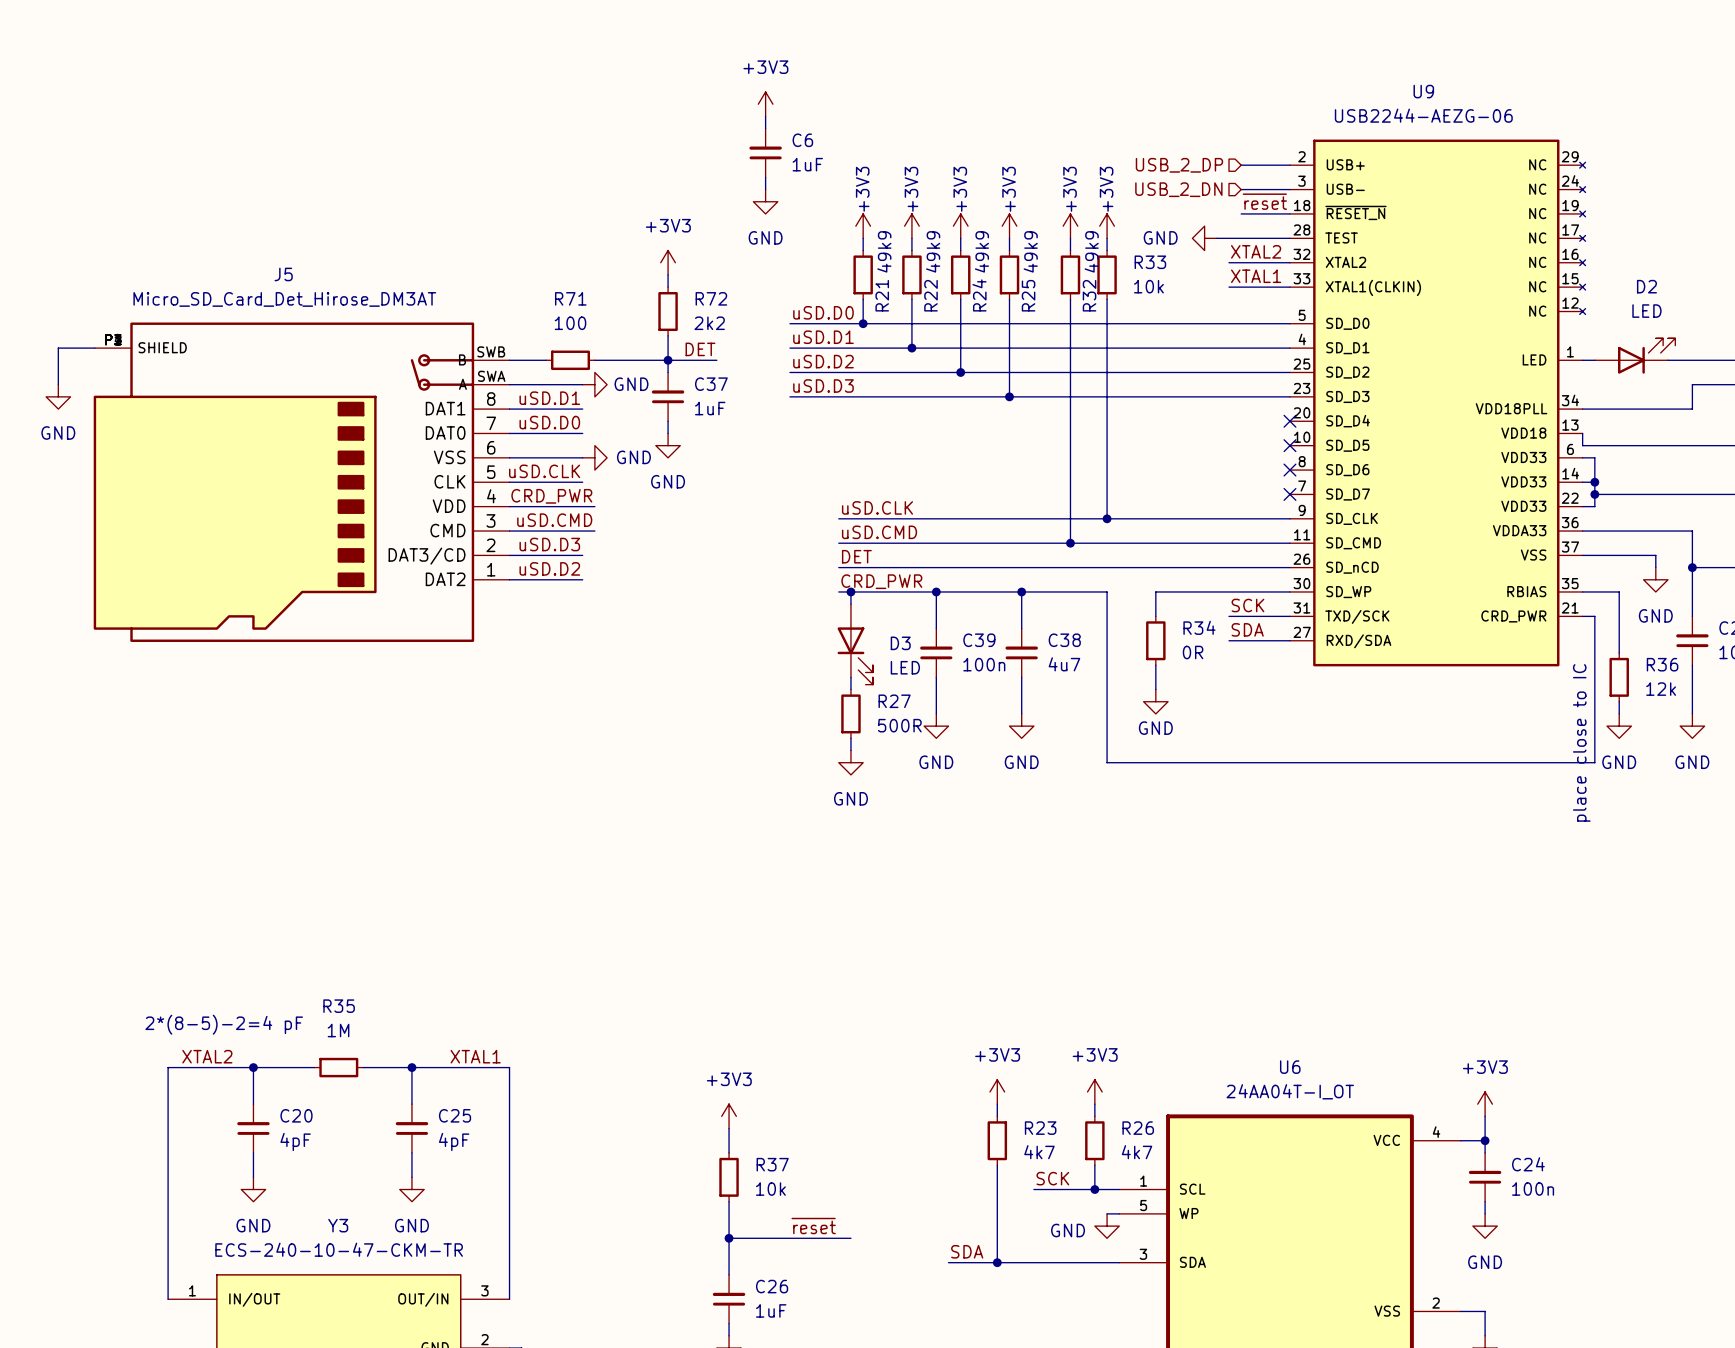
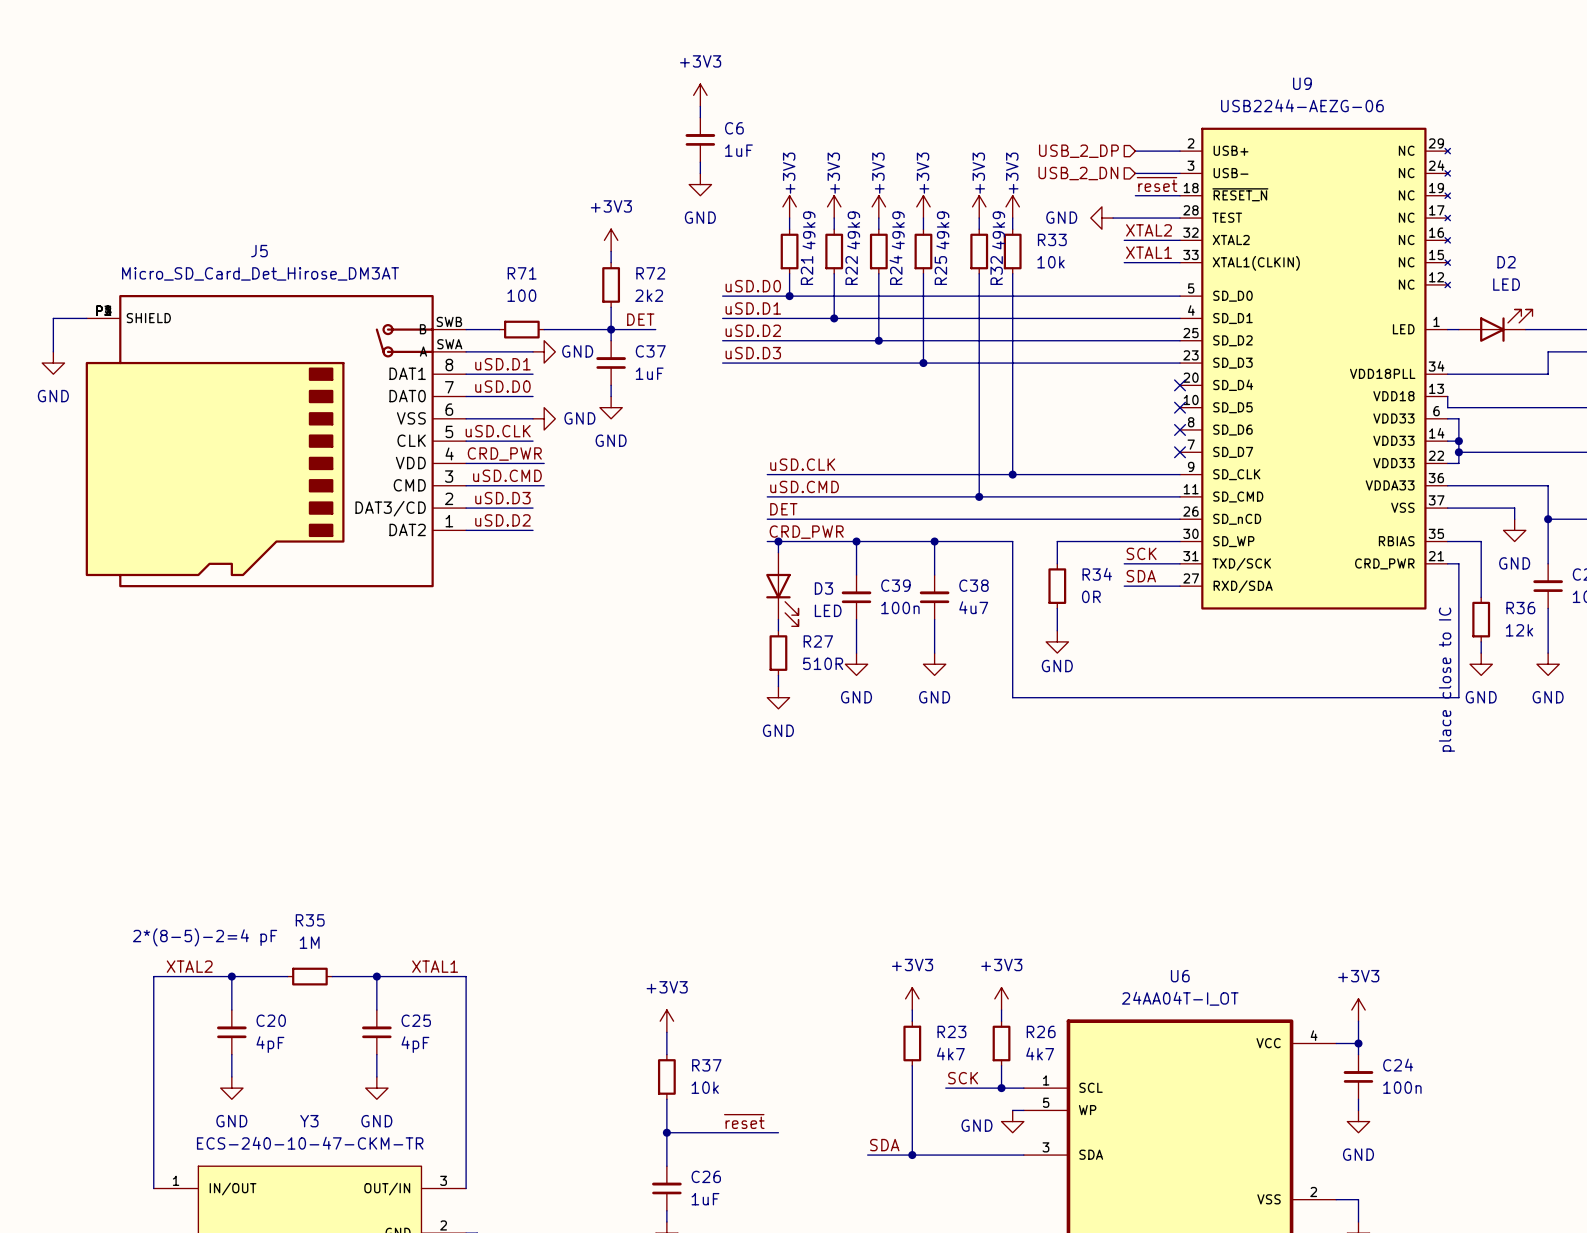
R27 text: 500R (899, 725) -> 510R (823, 663)

